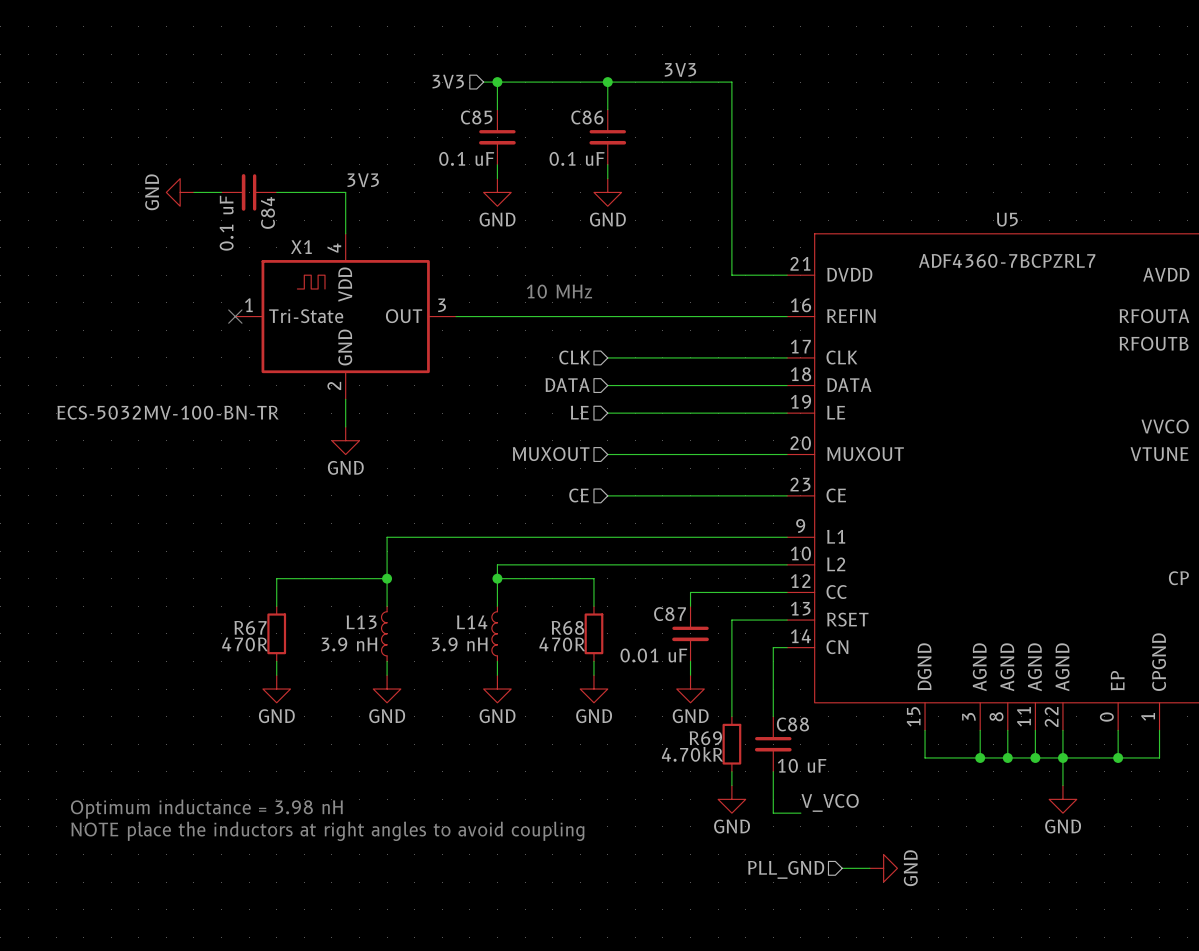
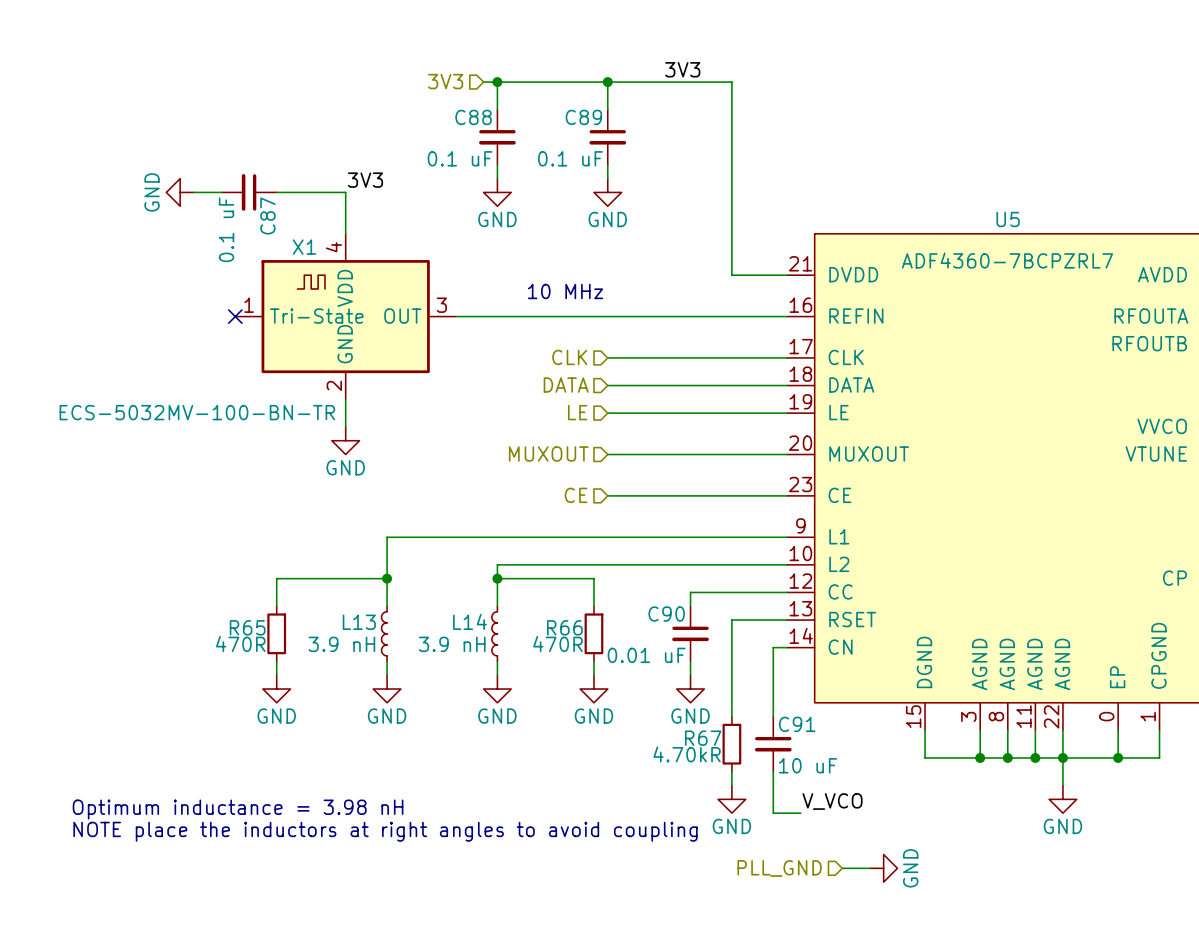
C85 name: C85 (476, 117) -> C88 (473, 117)
C86 name: C86 (587, 117) -> C89 (583, 117)
C84 name: C84 (268, 212) -> C87 (267, 215)
C87 name: C87 (670, 614) -> C90 (666, 614)
R67 name: R67 (250, 627) -> R65 (247, 627)
R68 name: R68 (567, 627) -> R66 (564, 627)
C88 name: C88 (792, 724) -> C91 (797, 724)
R69 name: R69 (705, 738) -> R67 (703, 738)

